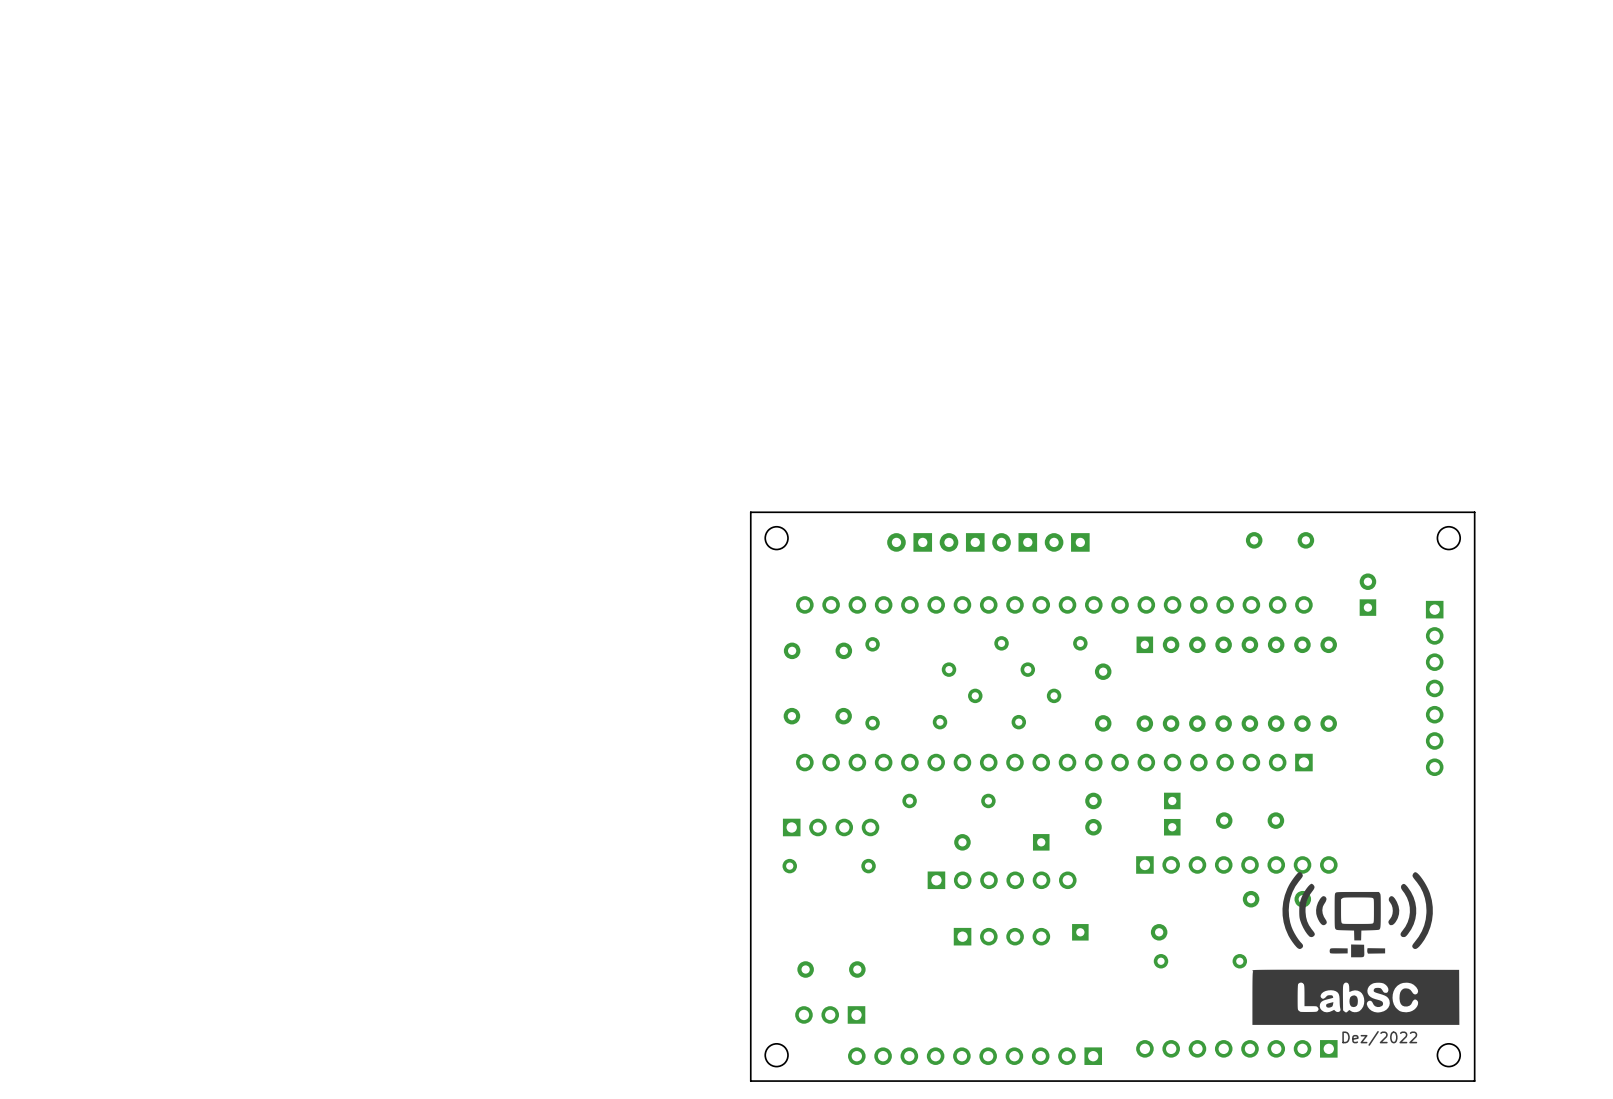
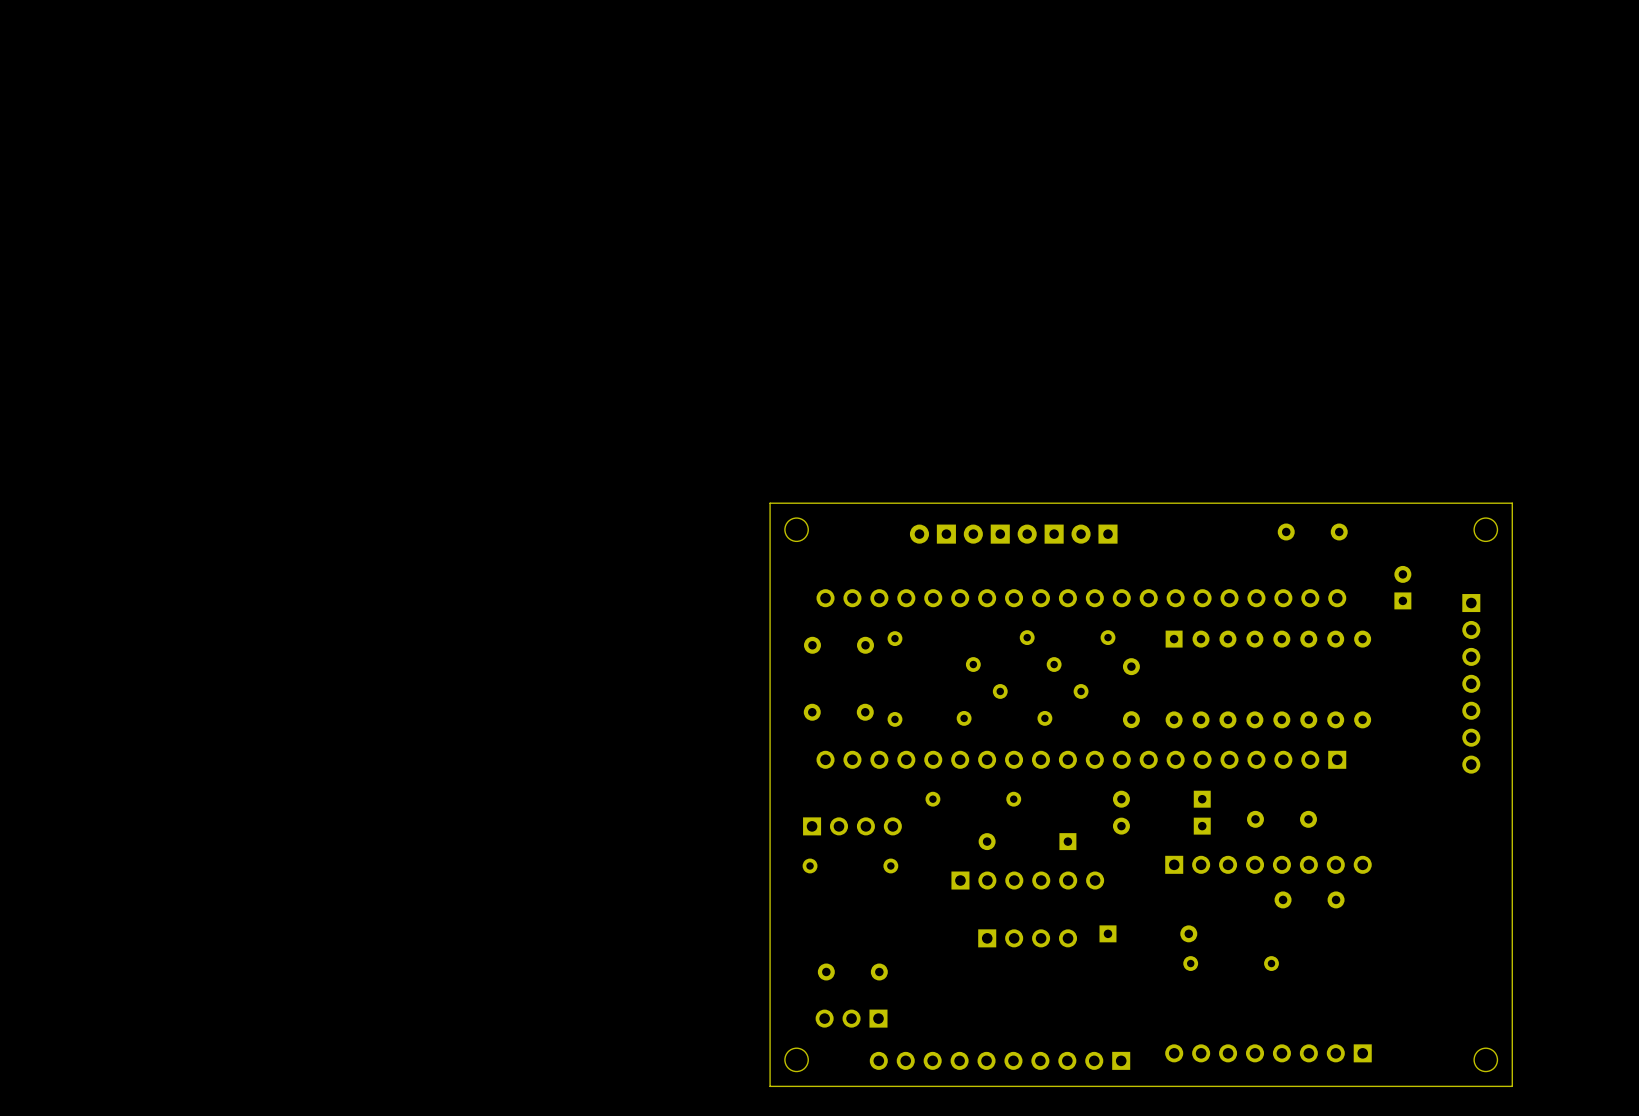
drawing: [1252, 872, 1460, 1025] -> none
text: Dez/2022 (1379, 1038) -> none

